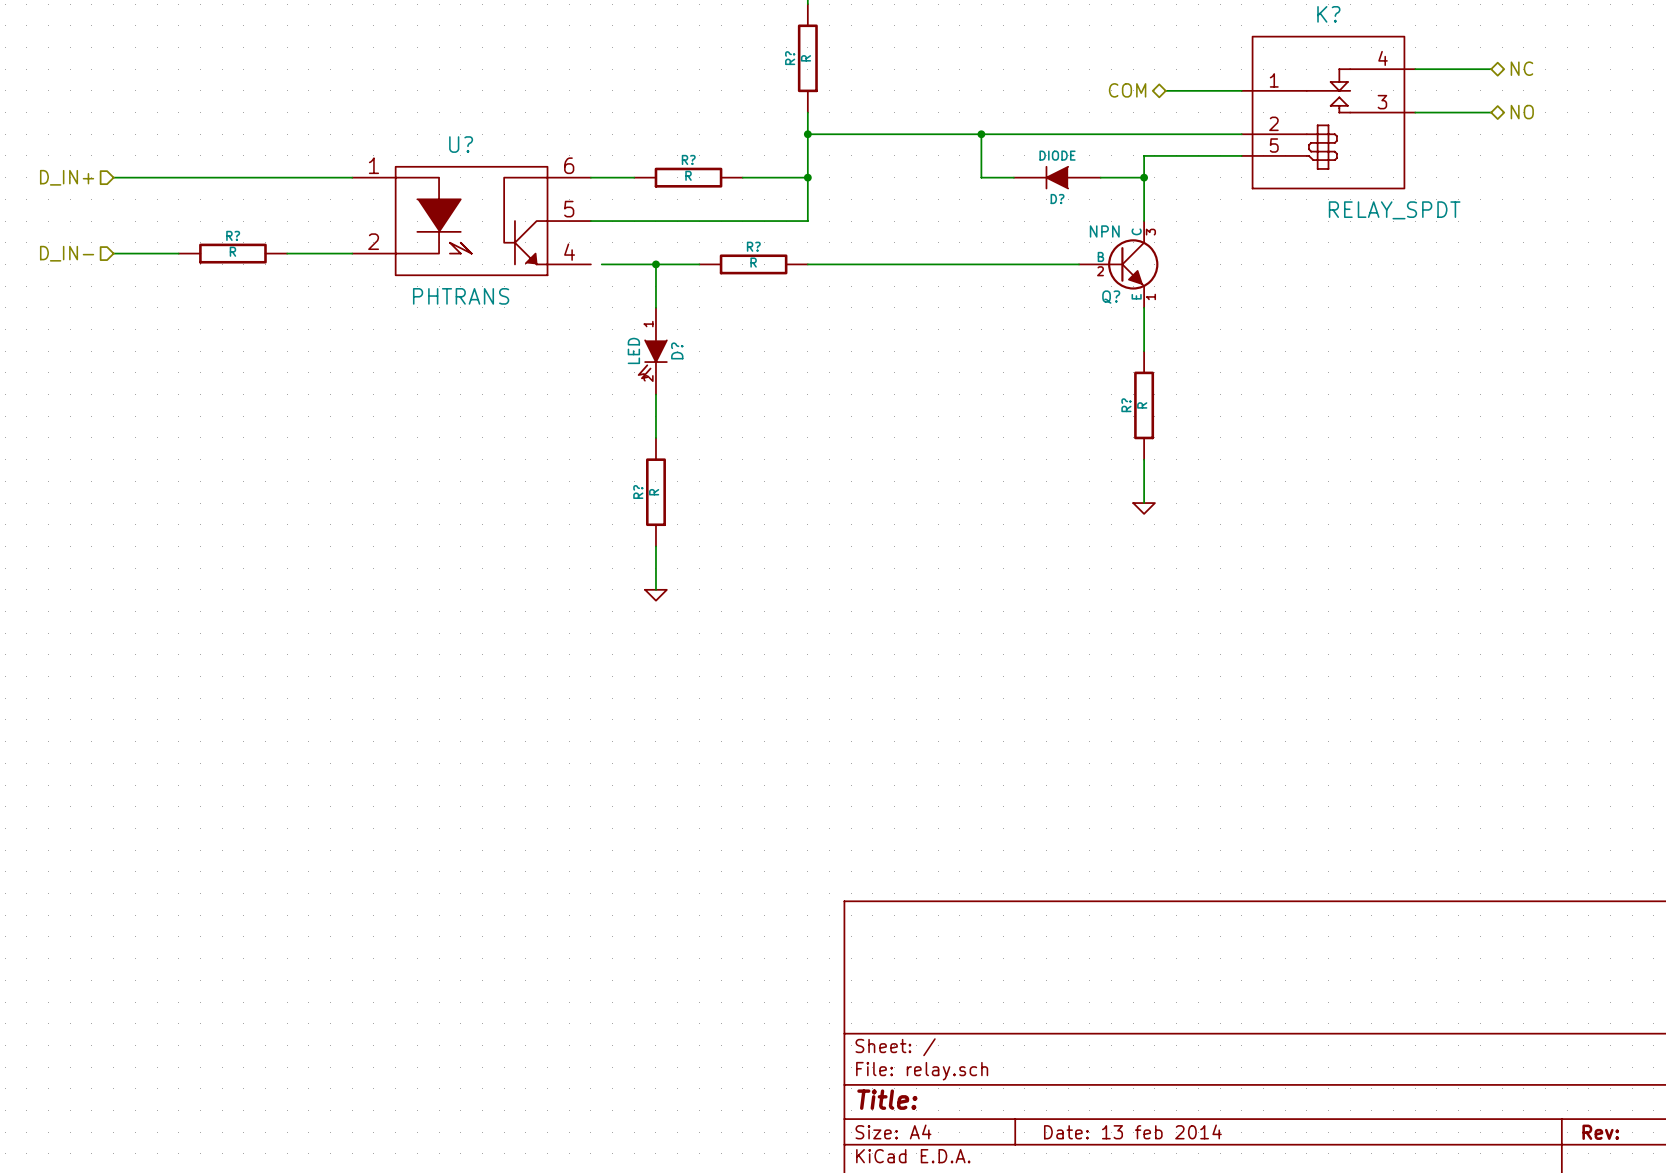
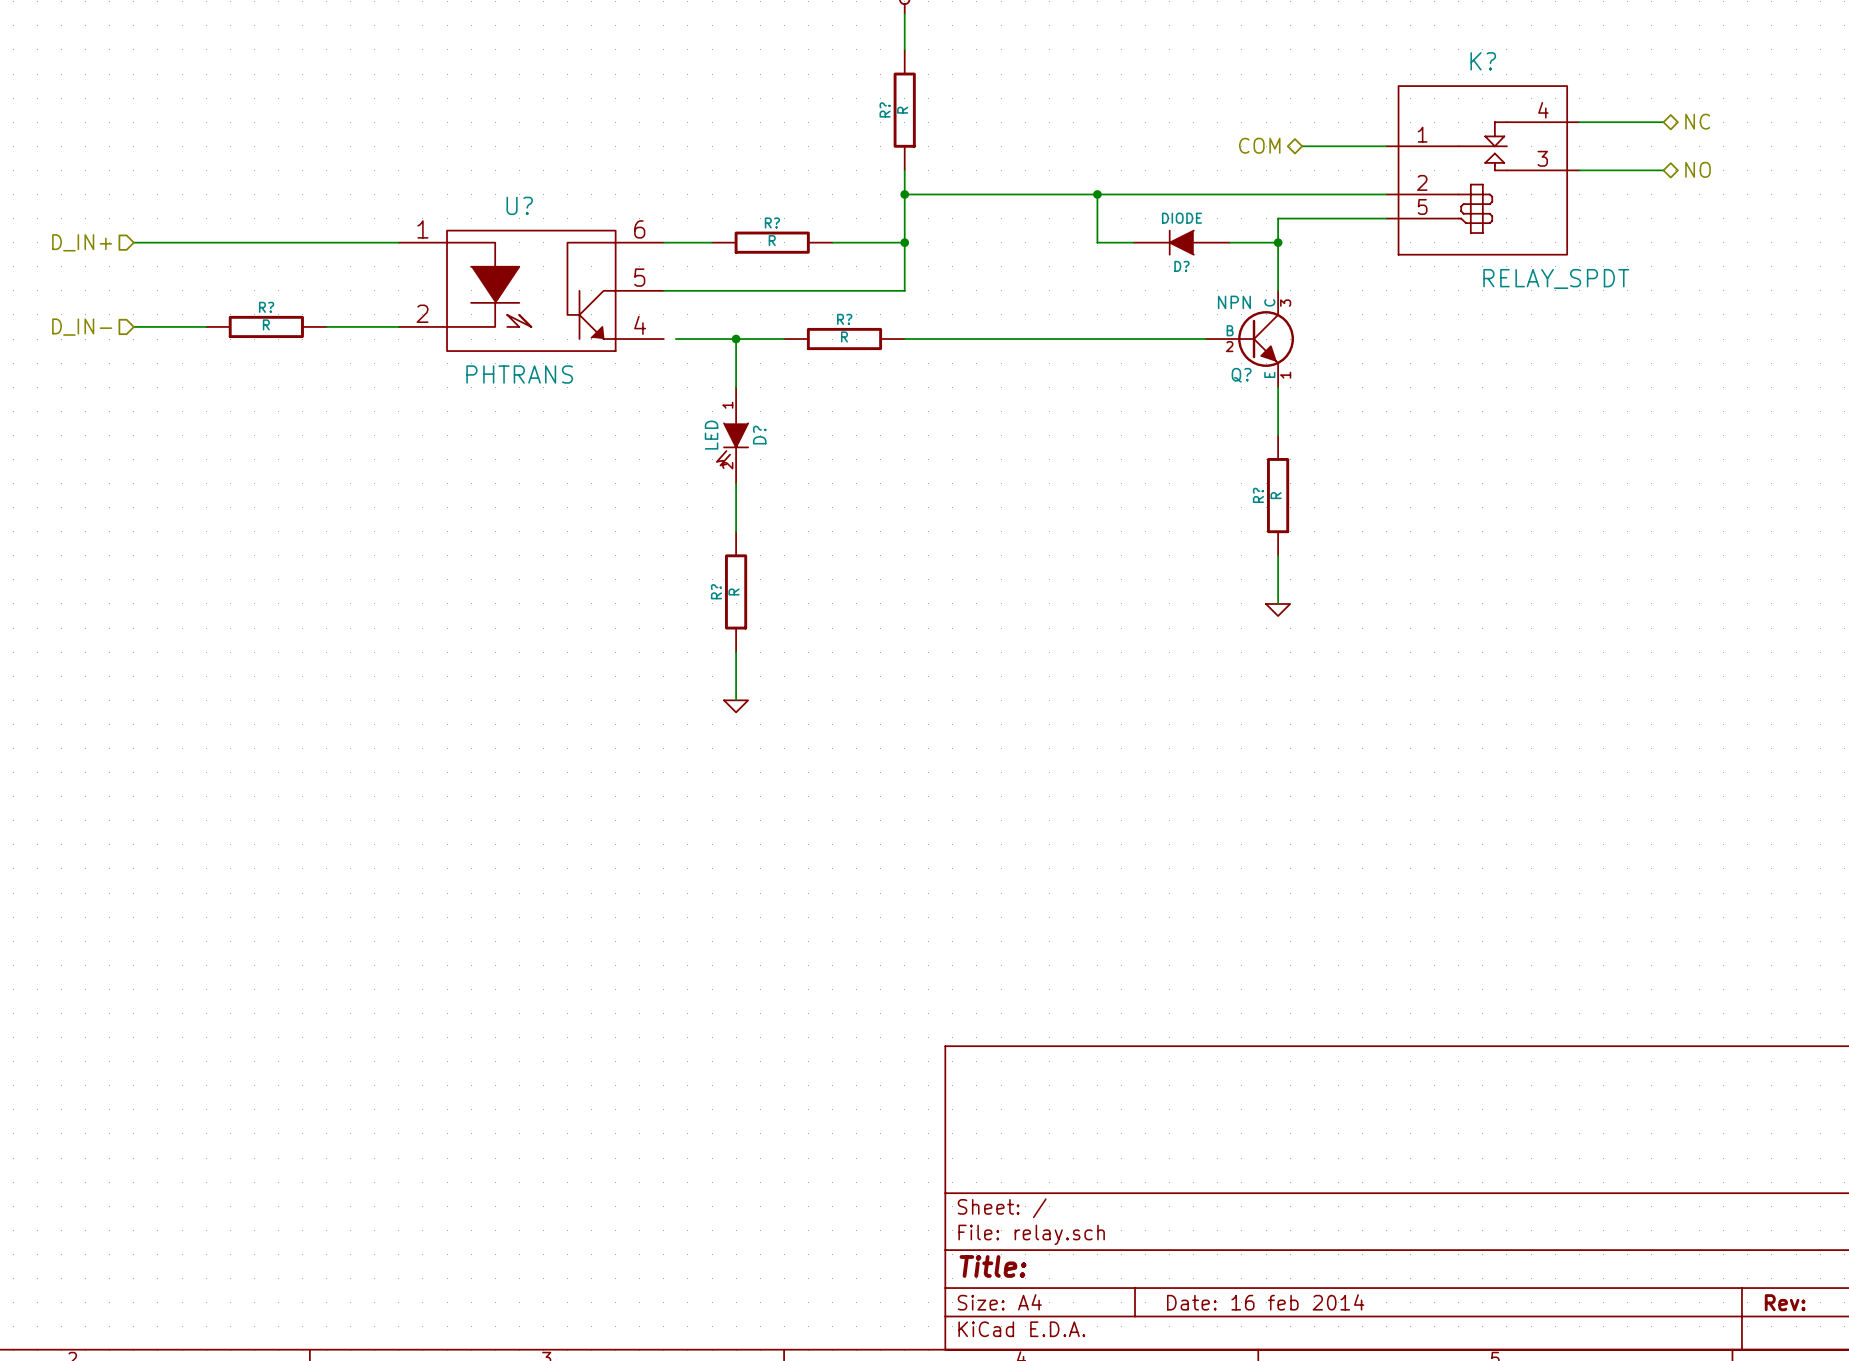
title block: Date: 13 feb 2014 (1132, 1131) -> Date: 16 feb 2014 (1265, 1302)

